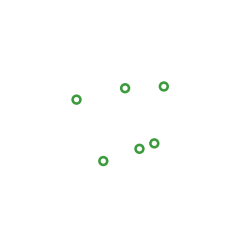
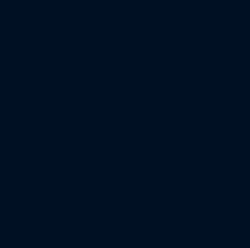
via: (163, 86) -> none
via: (125, 88) -> none
via: (76, 99) -> none
via: (154, 143) -> none
via: (139, 148) -> none
via: (103, 161) -> none

